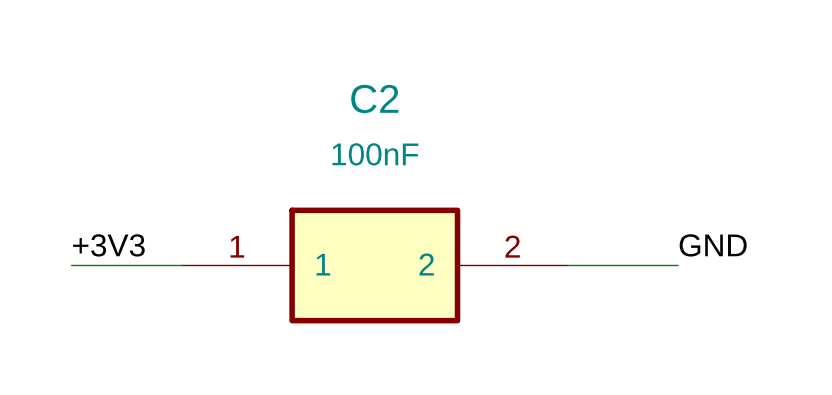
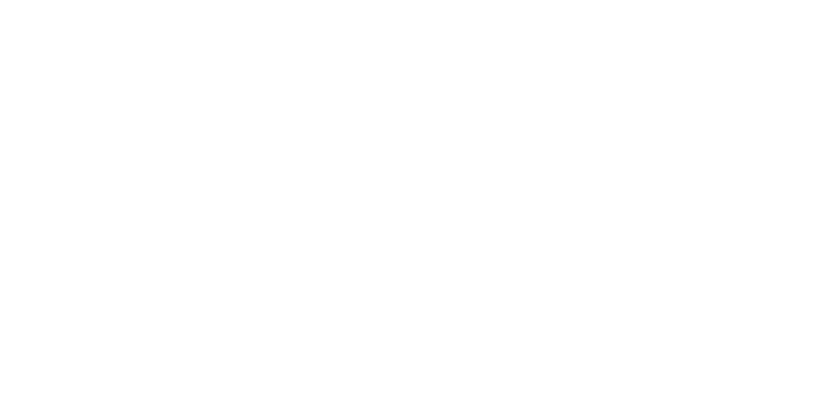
label: +3V3 (108, 245) -> none
label: GND (713, 245) -> none
wire: (71, 265) (181, 265) -> none
C2: 100nF (374, 265) -> none
wire: (567, 265) (678, 265) -> none

